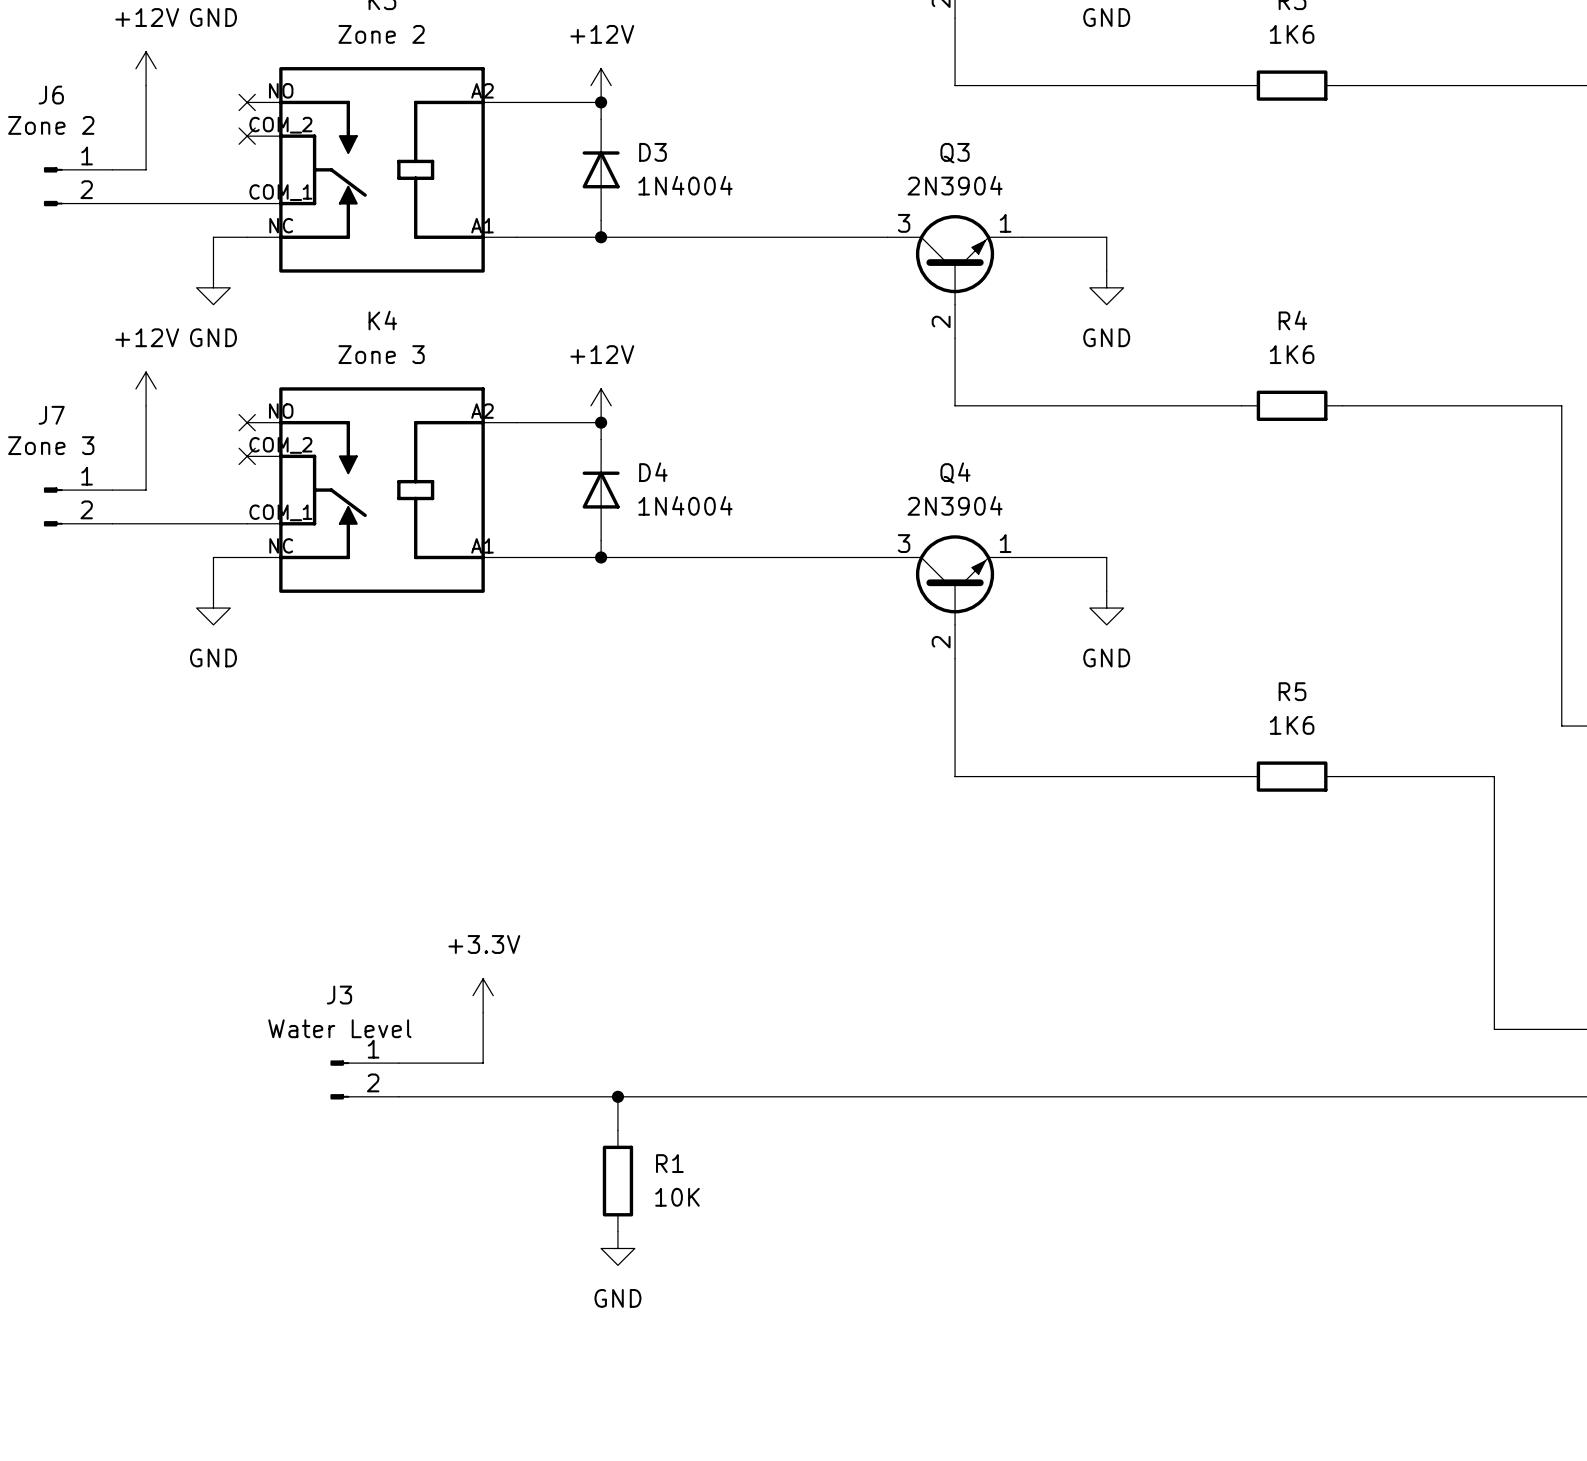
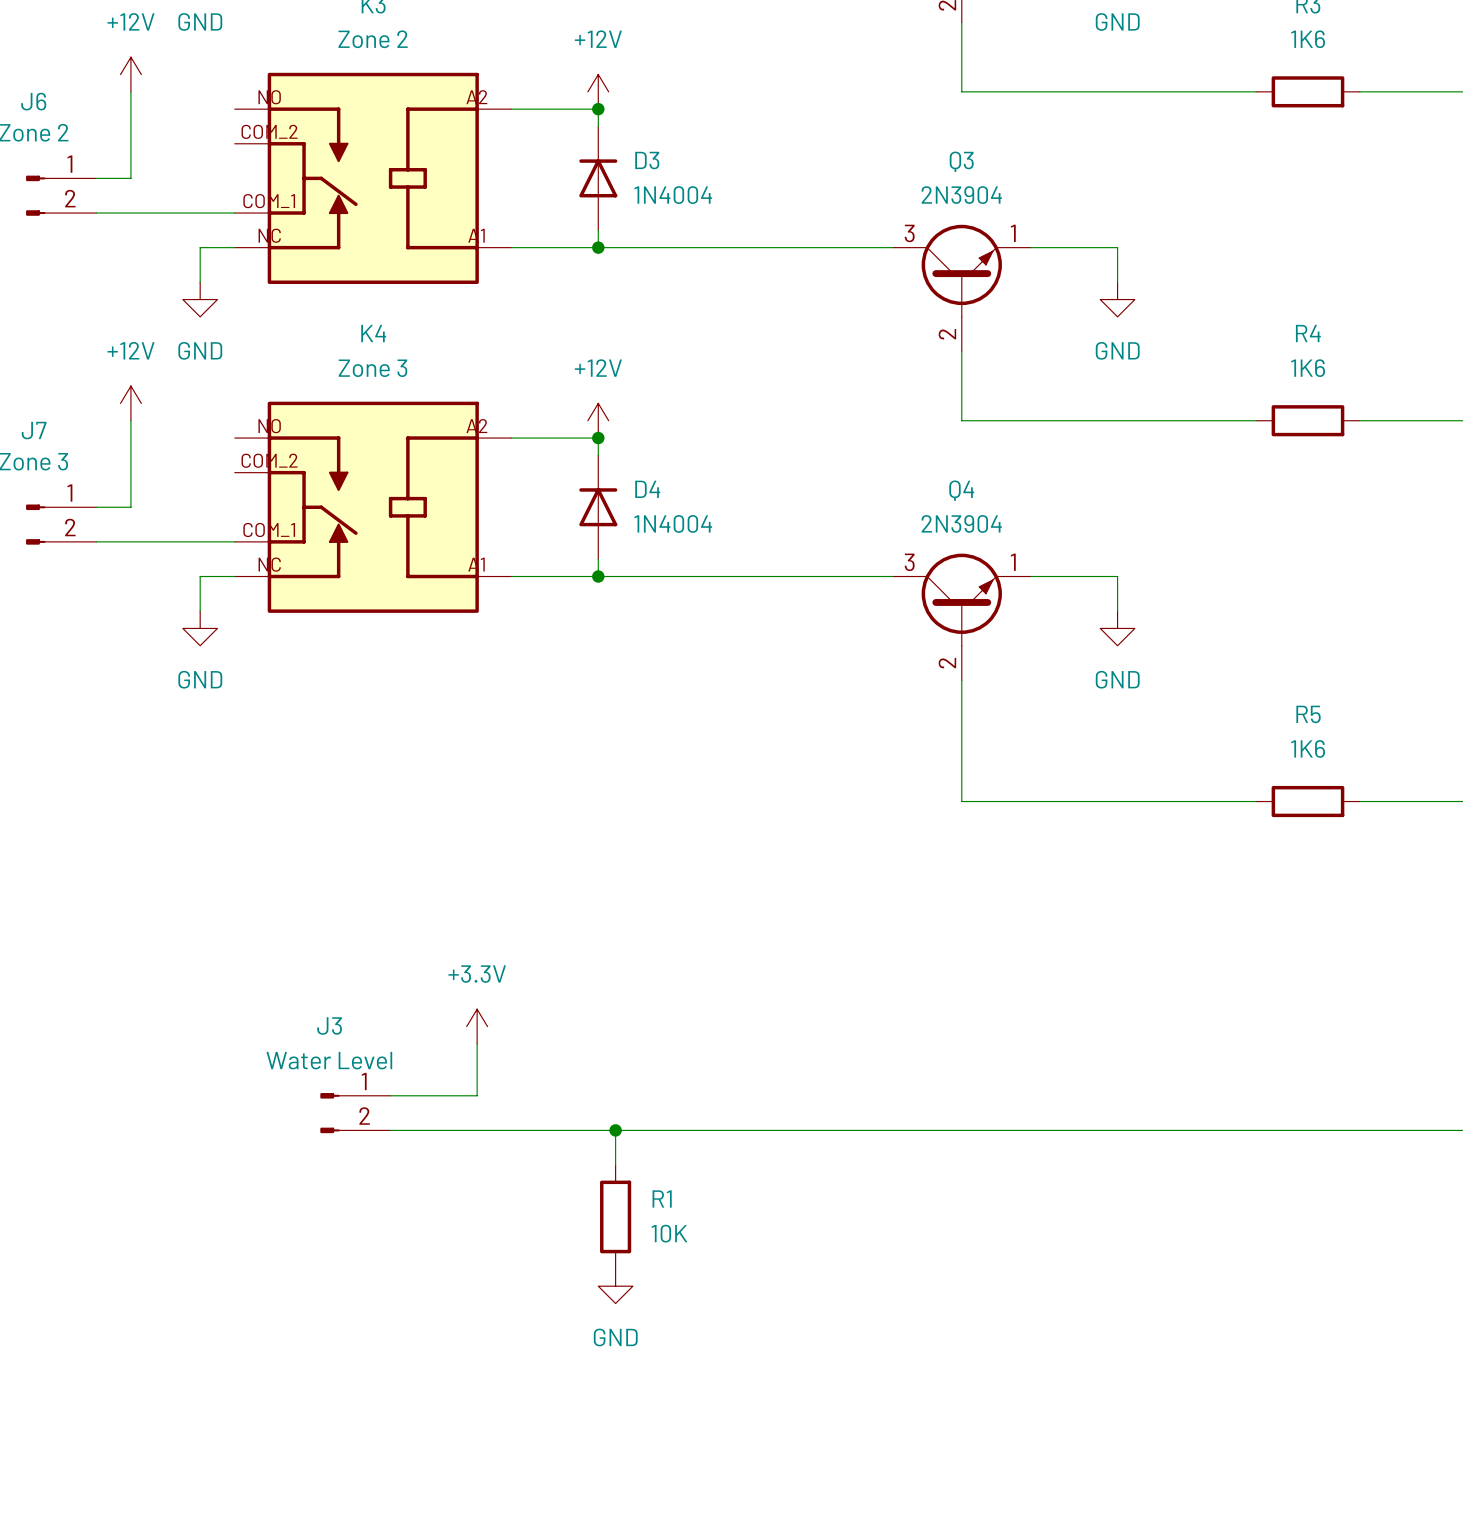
no-connect mark: (247, 102) -> none
no-connect mark: (247, 136) -> none
no-connect mark: (247, 422) -> none
no-connect mark: (247, 456) -> none

